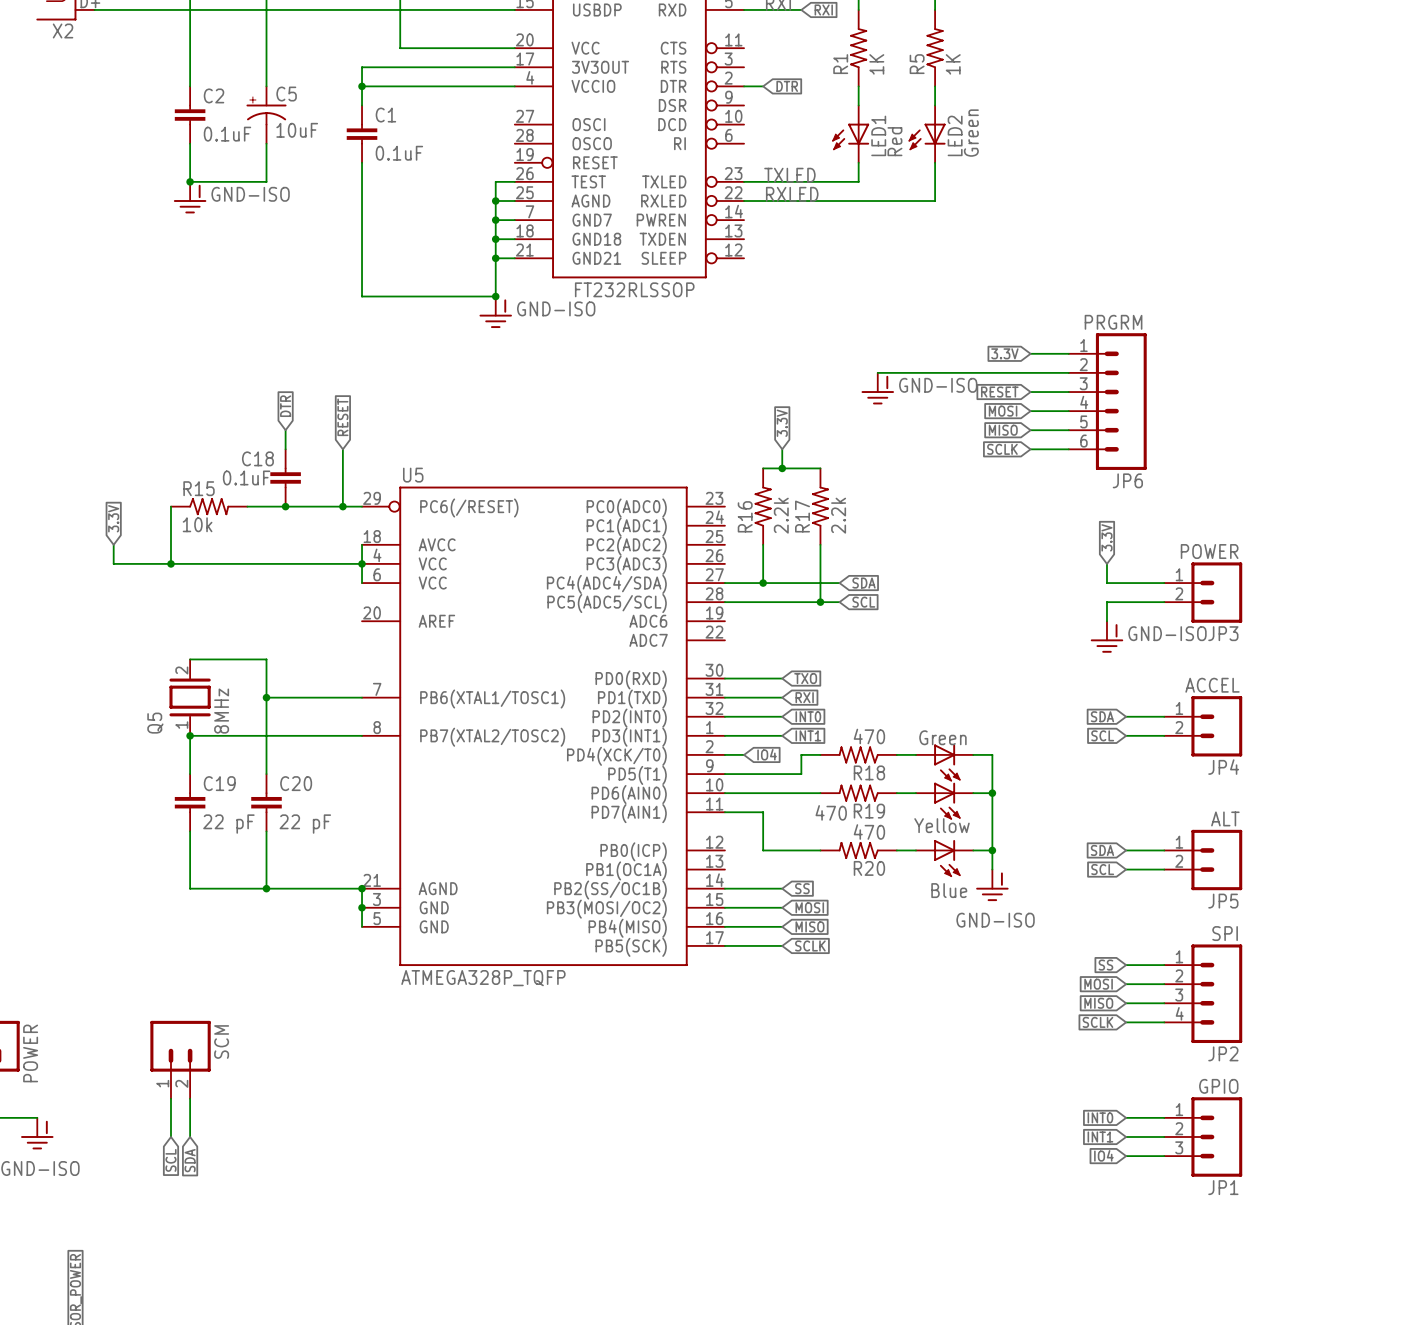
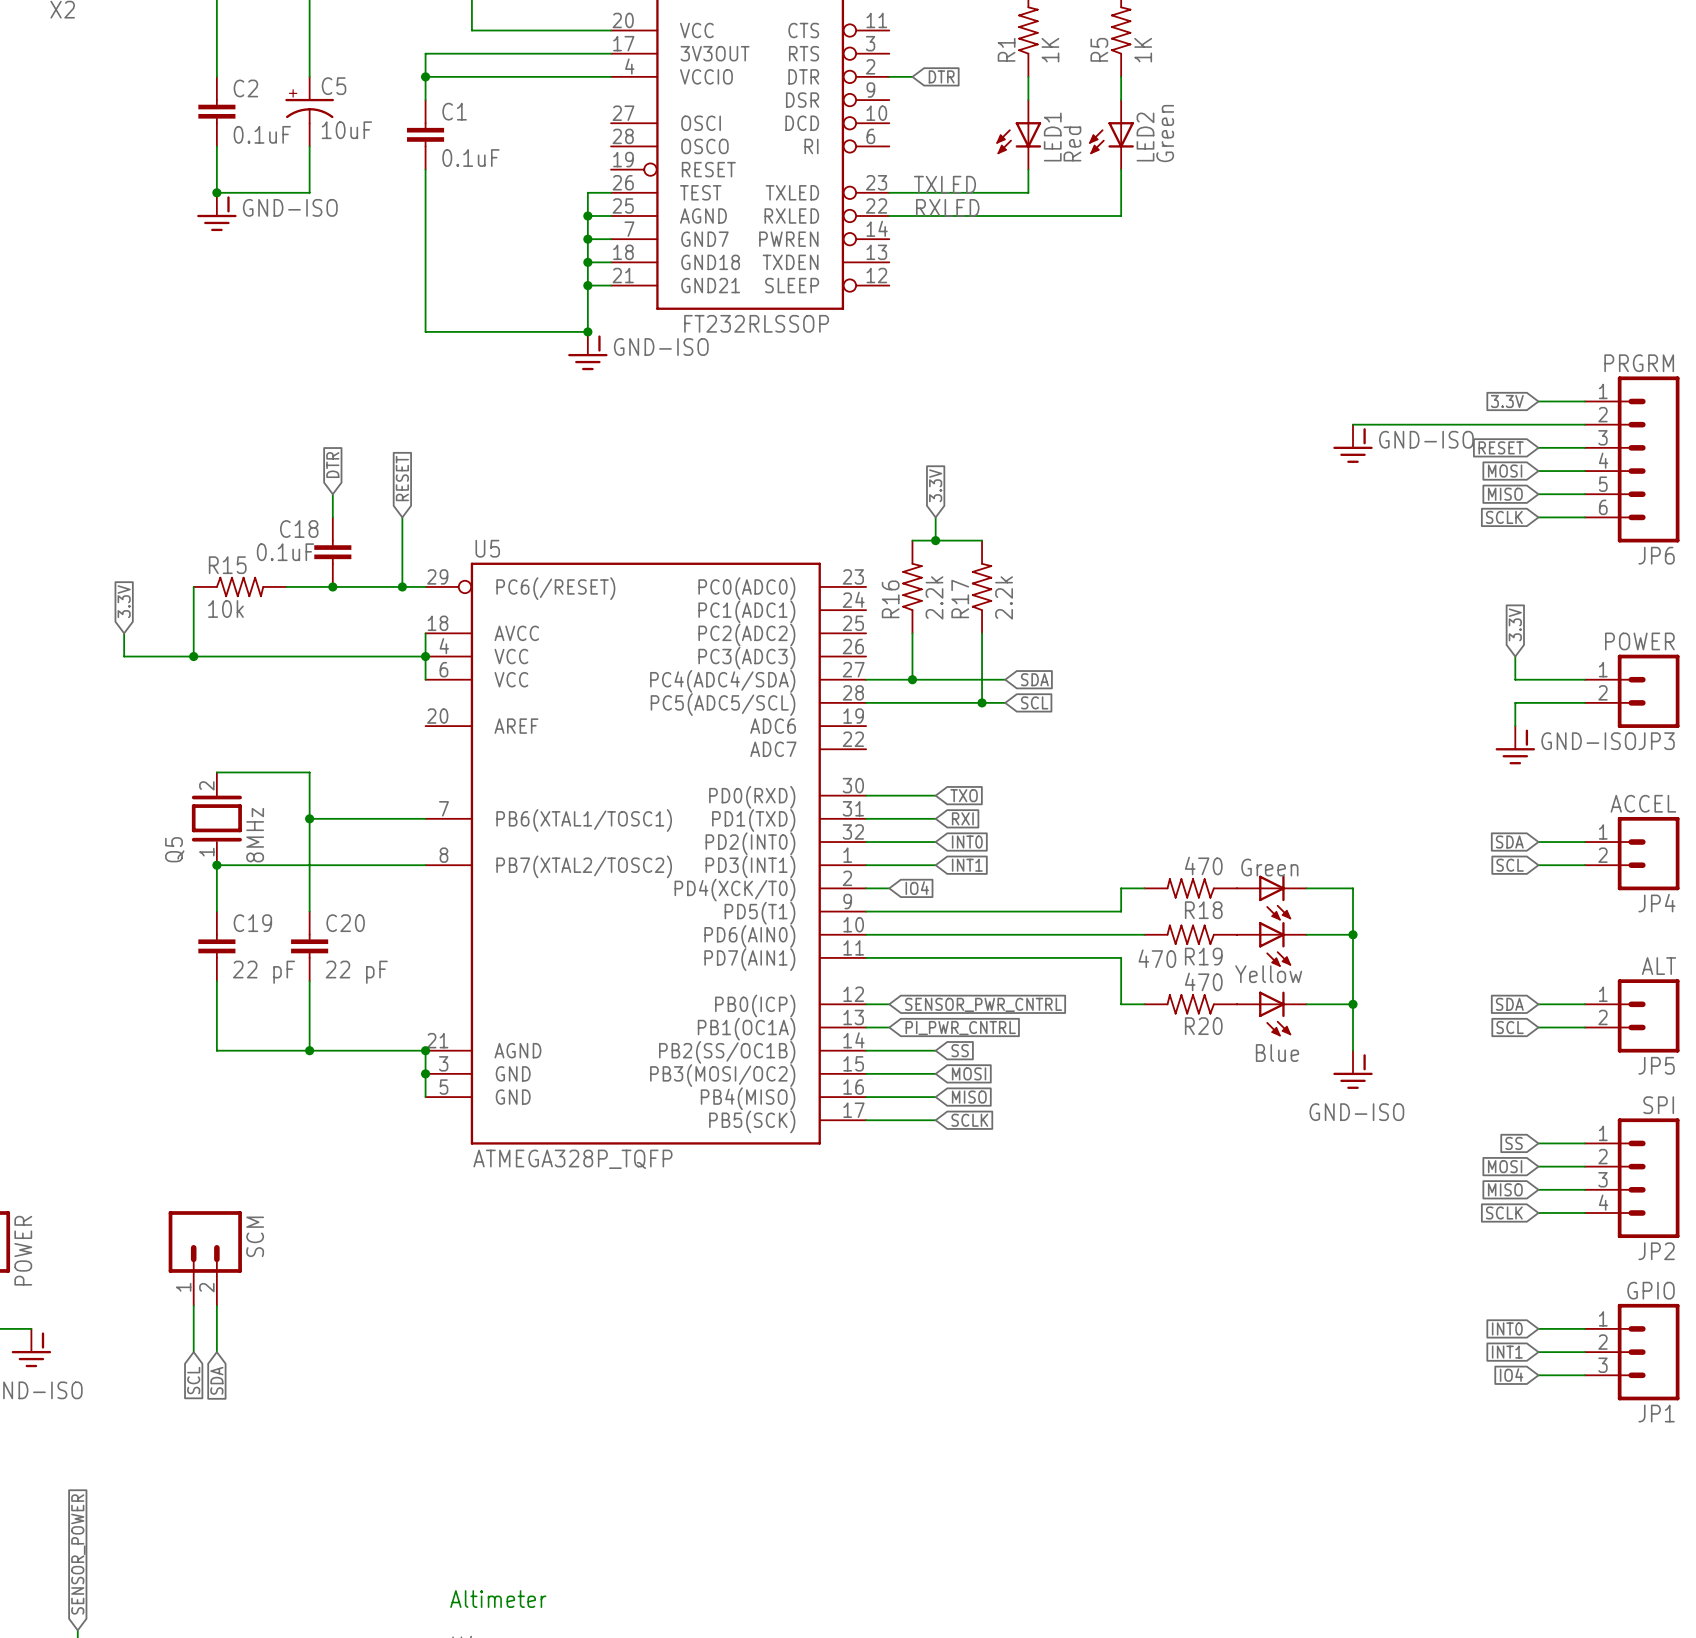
global label: 3.3V (1004, 353) -> none
wire: (1030, 353) (1068, 353) -> none
global label: none -> 3.3V (1507, 401)
wire: none -> (1538, 401) (1584, 401)
wire: (877, 372) (1068, 372) -> none
wire: none -> (1353, 424) (1584, 424)
power symbol: GND-ISO (877, 388) -> none
power symbol: none -> GND-ISO (1353, 443)
global label: RESET (999, 392) -> none
wire: (1030, 392) (1068, 392) -> none
global label: none -> RESET (1501, 447)
wire: none -> (1538, 447) (1584, 447)
JP6 position: (1107, 401) -> (1632, 459)
global label: MOSI (1003, 411) -> none
wire: (1030, 411) (1068, 411) -> none
global label: none -> MOSI (1505, 471)
wire: none -> (1538, 471) (1584, 471)
global label: MISO (1003, 430) -> none
wire: (1030, 430) (1068, 430) -> none
global label: none -> MISO (1505, 494)
wire: none -> (1538, 494) (1584, 494)
global label: SCLK (1002, 449) -> none
wire: (1030, 449) (1068, 449) -> none
global label: none -> SCLK (1504, 517)
wire: none -> (1538, 517) (1584, 517)
global label: 3.3V (1106, 537) -> none
global label: none -> 3.3V (1515, 624)
wire: (1106, 563) (1106, 583) (1164, 583) -> (1515, 656) (1515, 679) (1584, 679)
JP3 position: (1203, 592) -> (1632, 691)
wire: (1164, 602) (1106, 602) (1106, 621) -> (1584, 702) (1515, 702) (1515, 726)
power symbol: GND-ISO (1106, 637) -> none
power symbol: none -> GND-ISO (1515, 745)
global label: SDA (1102, 716) -> none
wire: (1126, 716) (1164, 716) -> (1538, 842) (1584, 842)
global label: none -> SDA (1509, 842)
JP4 position: (1203, 726) -> (1632, 853)
global label: SCL (1102, 735) -> none
wire: (1126, 735) (1164, 735) -> (1538, 865) (1584, 865)
global label: none -> SCL (1510, 865)
wire: (820, 754) (801, 754) (801, 774) -> (1144, 888) (1121, 888) (1121, 911) (958, 911)
R18 position: (858, 754) -> (1190, 888)
wire: (896, 754) (915, 754) -> none
wire: (973, 754) (992, 754) (992, 869) -> none
wire: none -> (1306, 888) (1353, 888) (1353, 1050)
part position: (944, 762) -> (1271, 898)
R19 position: (858, 793) -> (1190, 934)
wire: (973, 793) (992, 793) -> none
junction: (992, 793) -> none
wire: none -> (1306, 934) (1353, 934)
junction: none -> (1353, 934)
part position: (944, 801) -> (1271, 944)
wire: (763, 812) (763, 850) (820, 850) -> (912, 957) (1121, 957) (1121, 1004) (1144, 1004)
global label: none -> SENSOR_PWR_CNTRL (983, 1004)
R20 position: (858, 850) -> (1190, 1004)
wire: (896, 850) (915, 850) -> (866, 1004) (889, 1004)
wire: (973, 850) (992, 850) -> none
junction: (992, 850) -> none
global label: SDA (1102, 850) -> none
wire: (1126, 850) (1164, 850) -> (1353, 1004) (1306, 1004)
junction: none -> (1353, 1004)
global label: none -> SDA (1509, 1004)
wire: none -> (1538, 1004) (1584, 1004)
part position: (944, 858) -> (1271, 1013)
JP5 position: (1203, 860) -> (1632, 1015)
wire: none -> (866, 1027) (889, 1027)
global label: SCL (1102, 869) -> none
wire: (1126, 869) (1164, 869) -> (1538, 1027) (1584, 1027)
global label: none -> SCL (1510, 1027)
global label: none -> PI_PWR_CNTRL (960, 1028)
power symbol: GND-ISO (992, 885) -> none
power symbol: none -> GND-ISO (1353, 1069)
global label position: SS (1105, 965) -> SS (1514, 1143)
wire: (1126, 965) (1164, 965) -> (1538, 1143) (1584, 1143)
global label position: MOSI (1098, 984) -> MOSI (1505, 1166)
wire: (1126, 984) (1164, 984) -> (1538, 1166) (1584, 1166)
JP2 position: (1203, 993) -> (1632, 1178)
global label position: MISO (1098, 1003) -> MISO (1505, 1189)
wire: (1126, 1003) (1164, 1003) -> (1538, 1189) (1584, 1189)
global label position: SCLK (1097, 1022) -> SCLK (1504, 1213)
wire: (1126, 1022) (1164, 1022) -> (1538, 1213) (1584, 1213)
global label position: INT0 (1100, 1117) -> INT0 (1507, 1328)
wire: (1126, 1117) (1164, 1117) -> (1538, 1328) (1584, 1328)
global label position: INT1 (1100, 1136) -> INT1 (1507, 1352)
wire: (1126, 1136) (1164, 1136) -> (1538, 1352) (1584, 1352)
JP1 position: (1203, 1136) -> (1632, 1352)
global label position: IO4 (1103, 1155) -> IO4 (1511, 1375)
wire: (1126, 1156) (1164, 1156) -> (1538, 1375) (1584, 1375)

